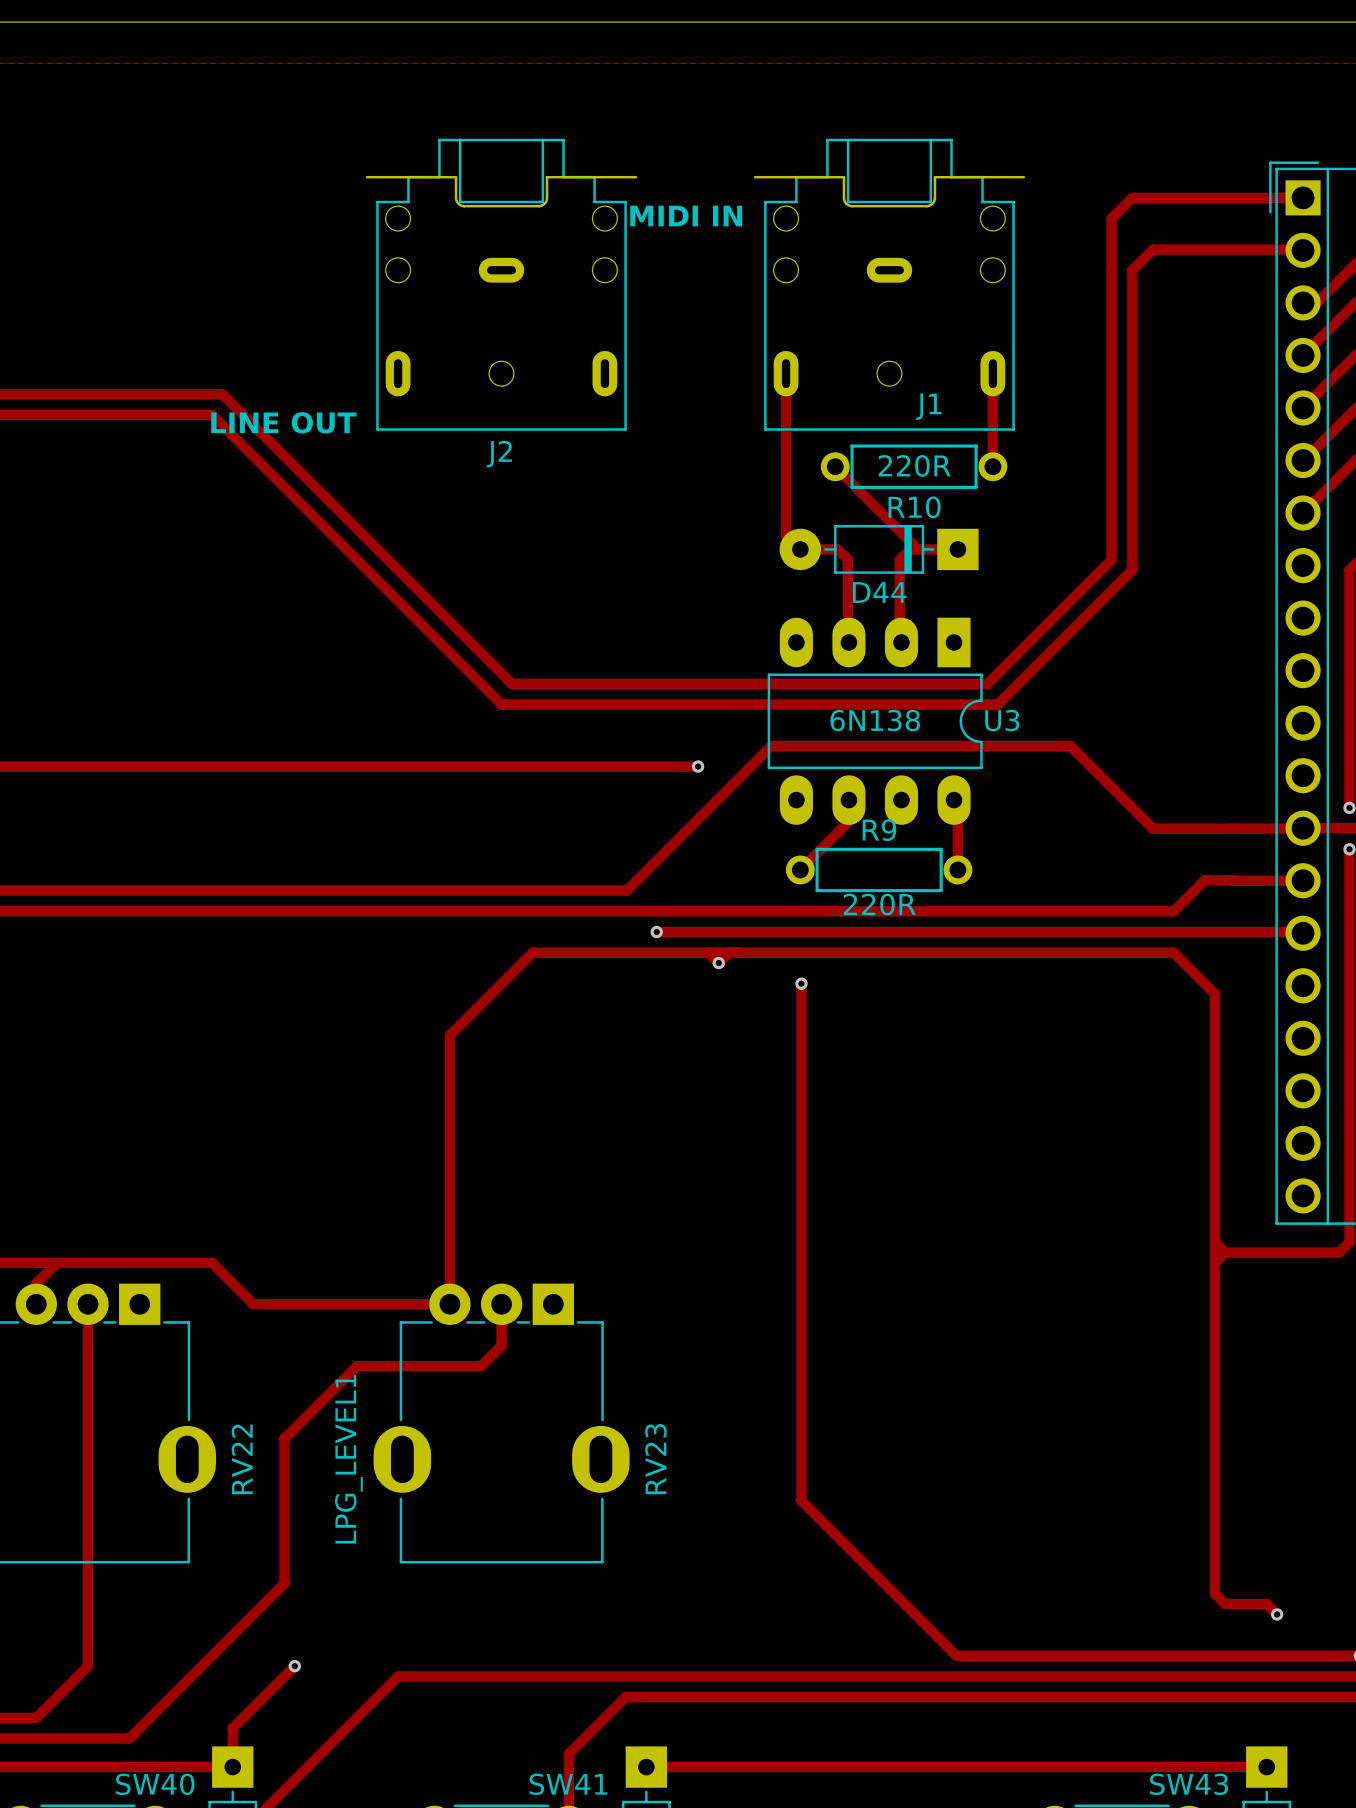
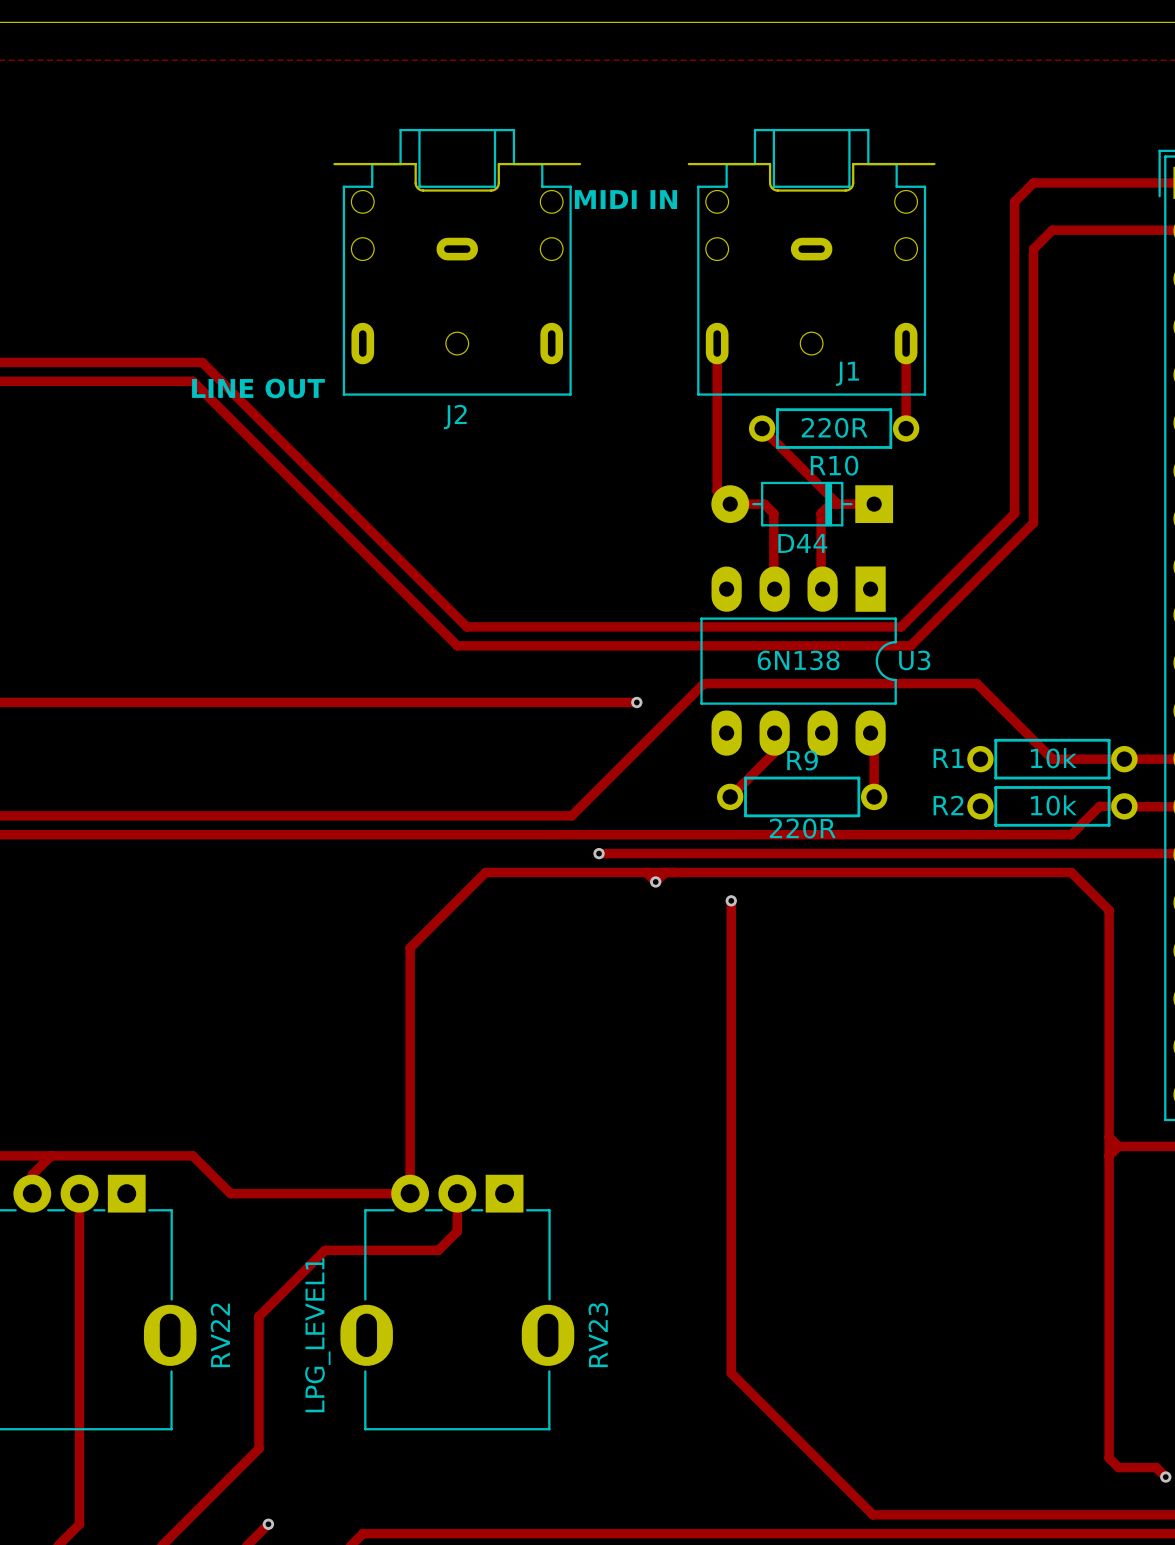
R1: none -> 10k (1052, 759)
R2: none -> 10k (1052, 806)

